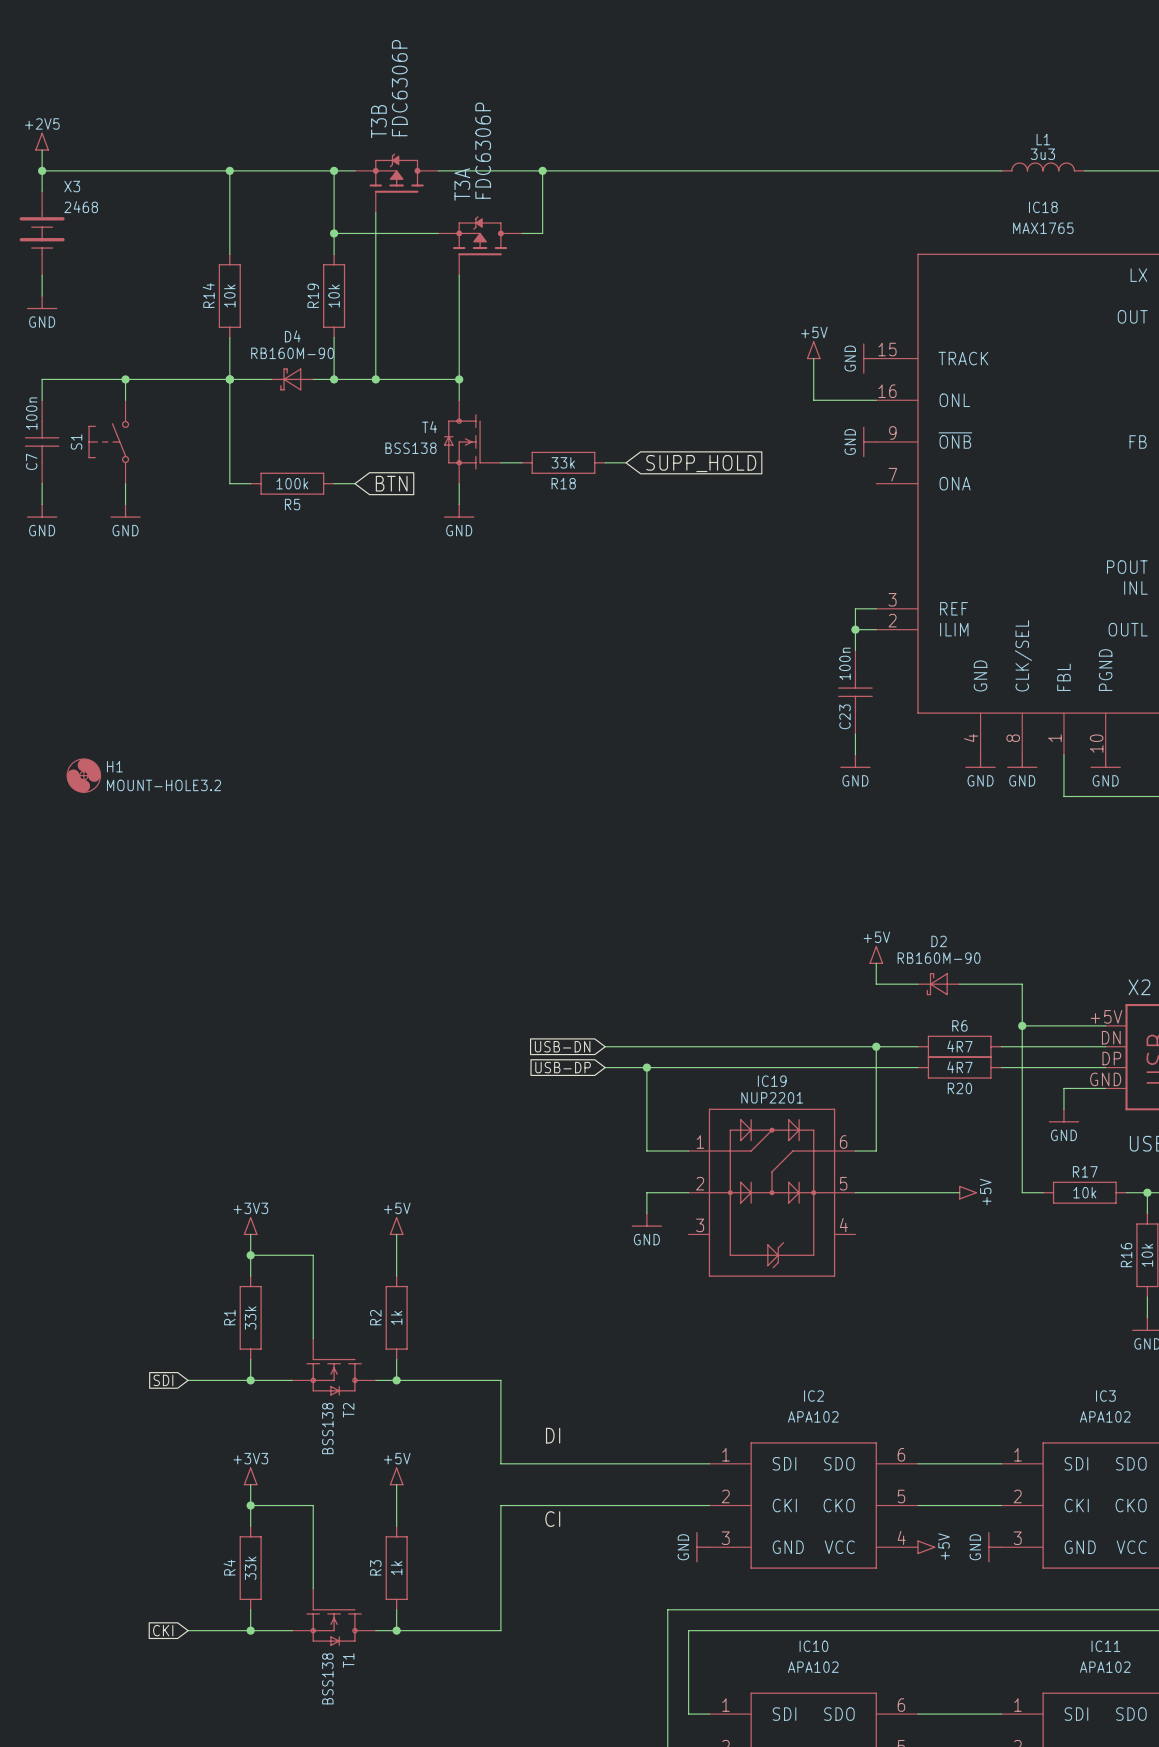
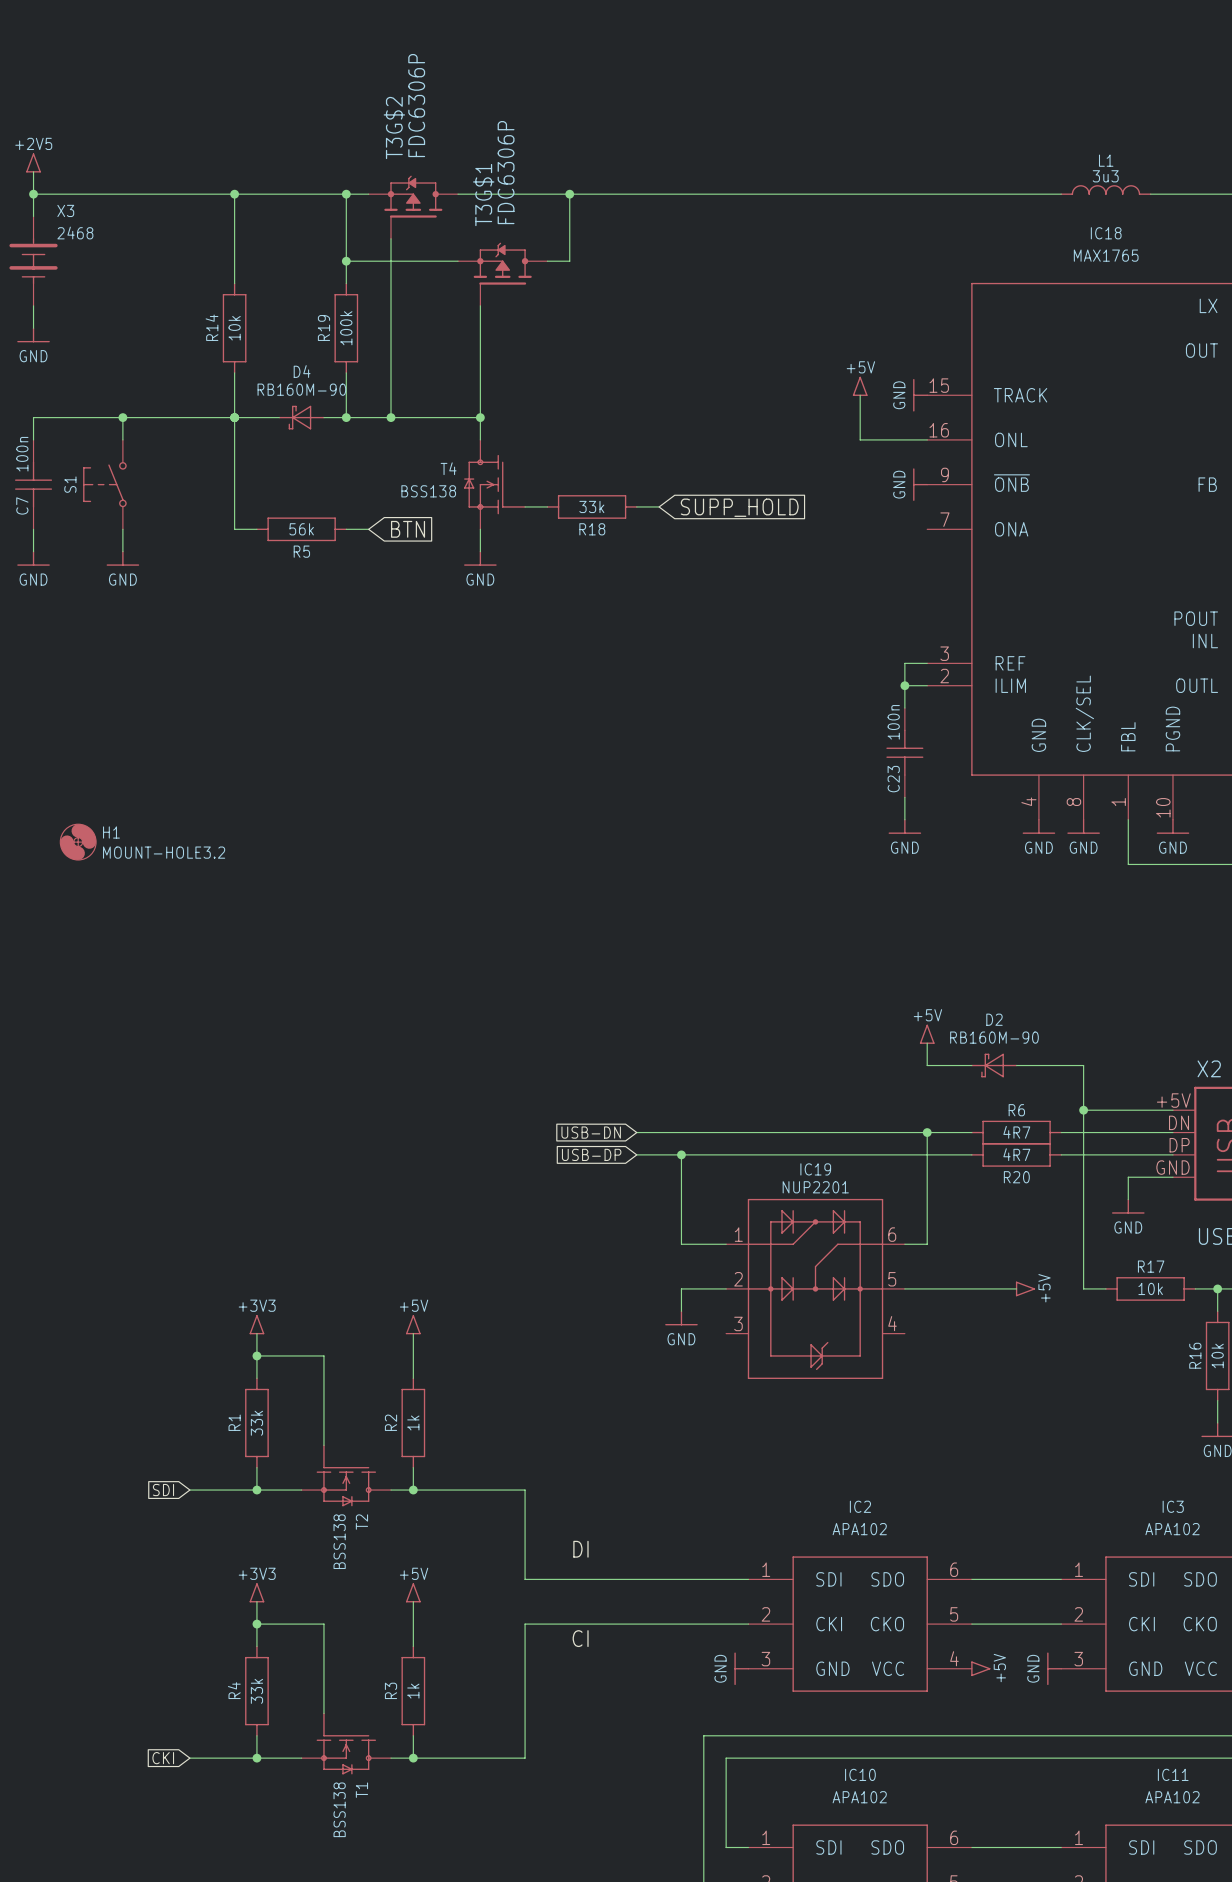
T3B name: T3B (378, 121) -> T3G$2 (394, 128)
T3A name: T3A (462, 184) -> T3G$1 (483, 195)
R19 value: 10k (334, 296) -> 100k (346, 328)
R5 value: 100k (292, 483) -> 56k (301, 529)

